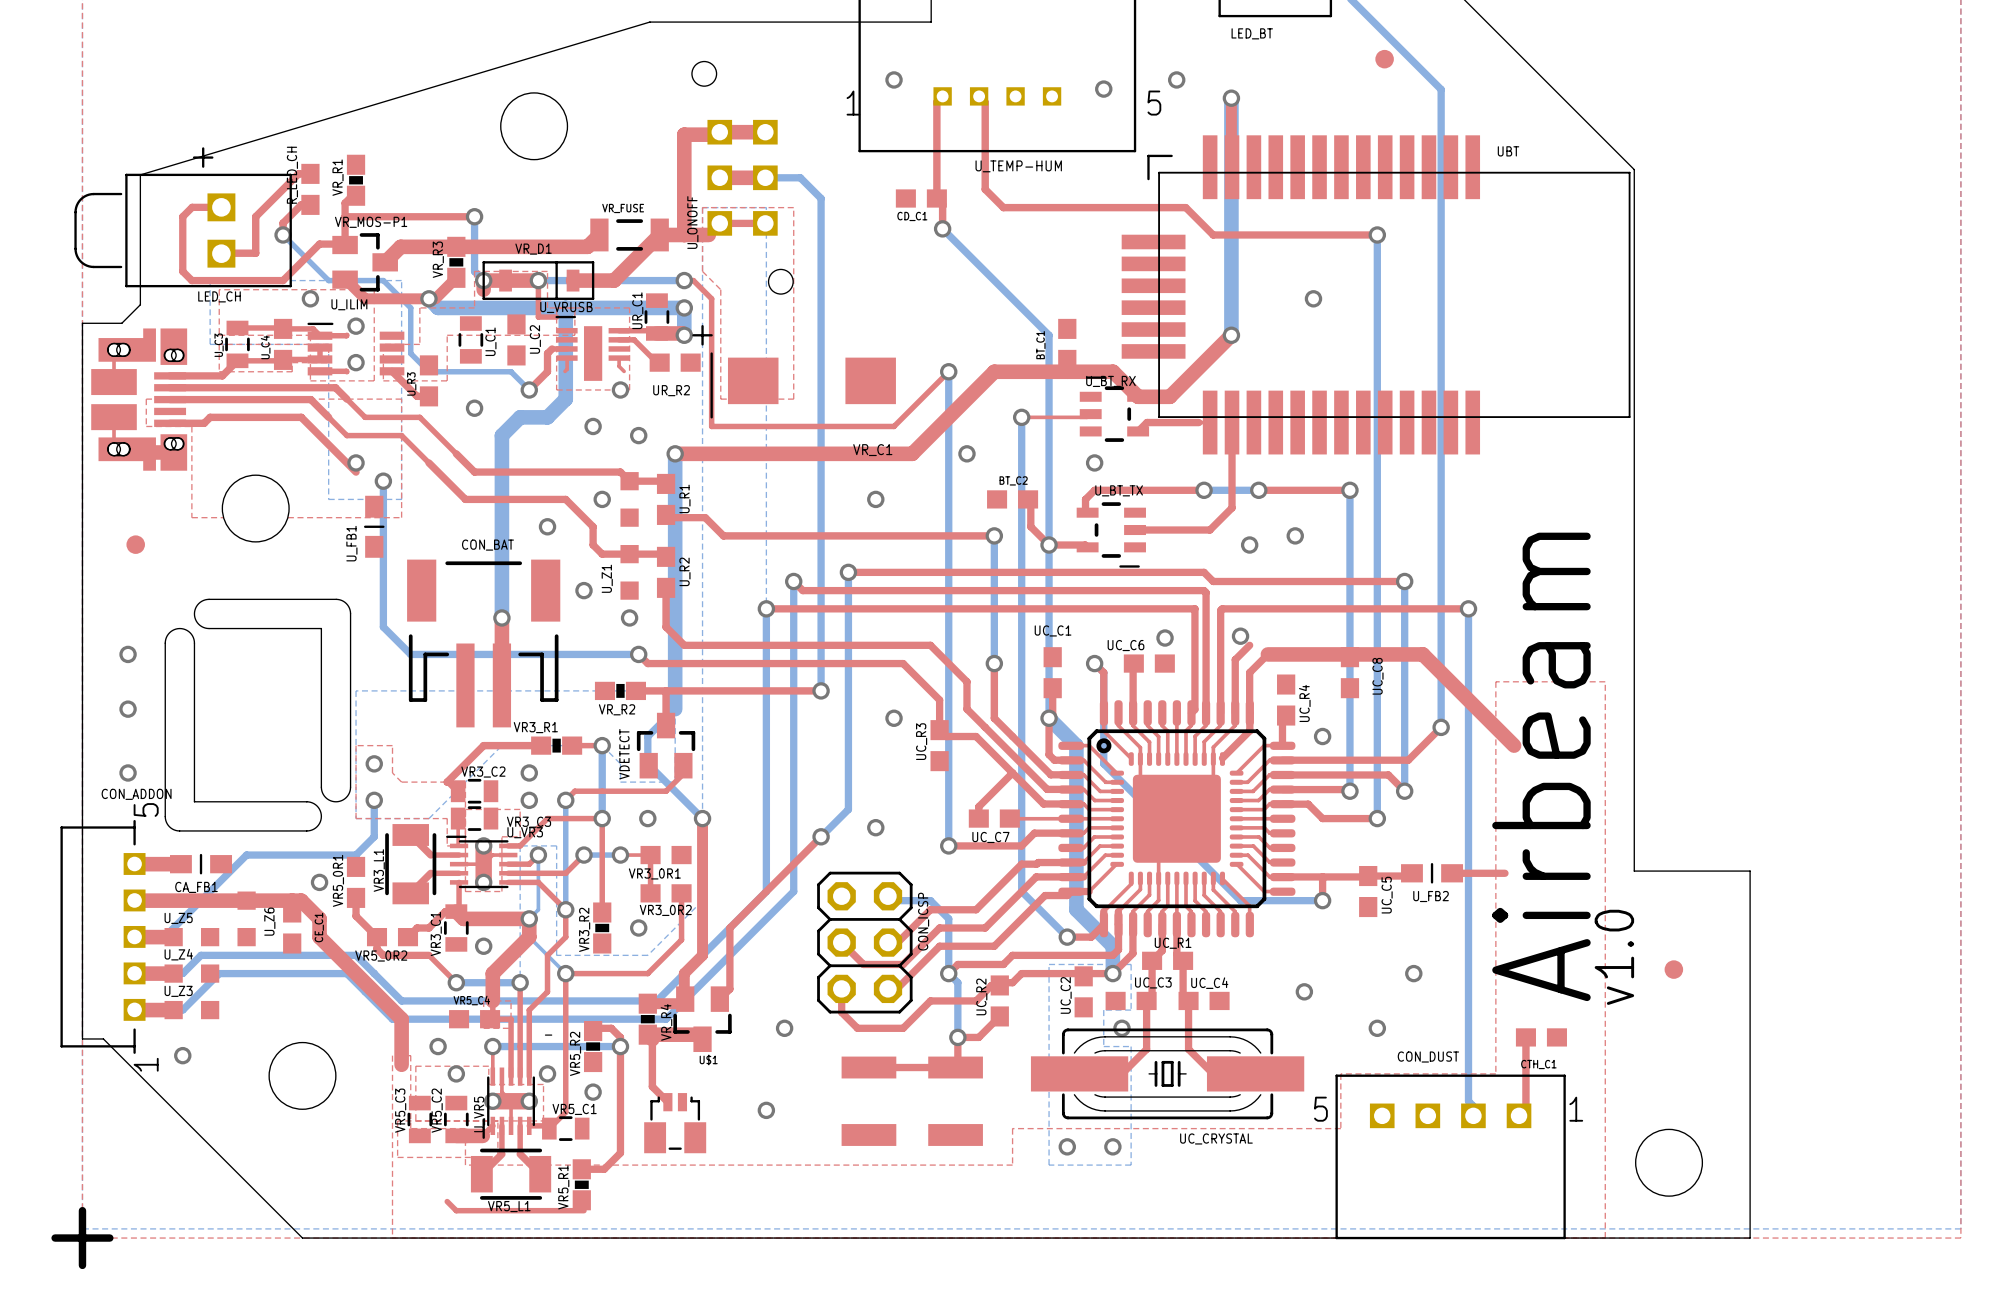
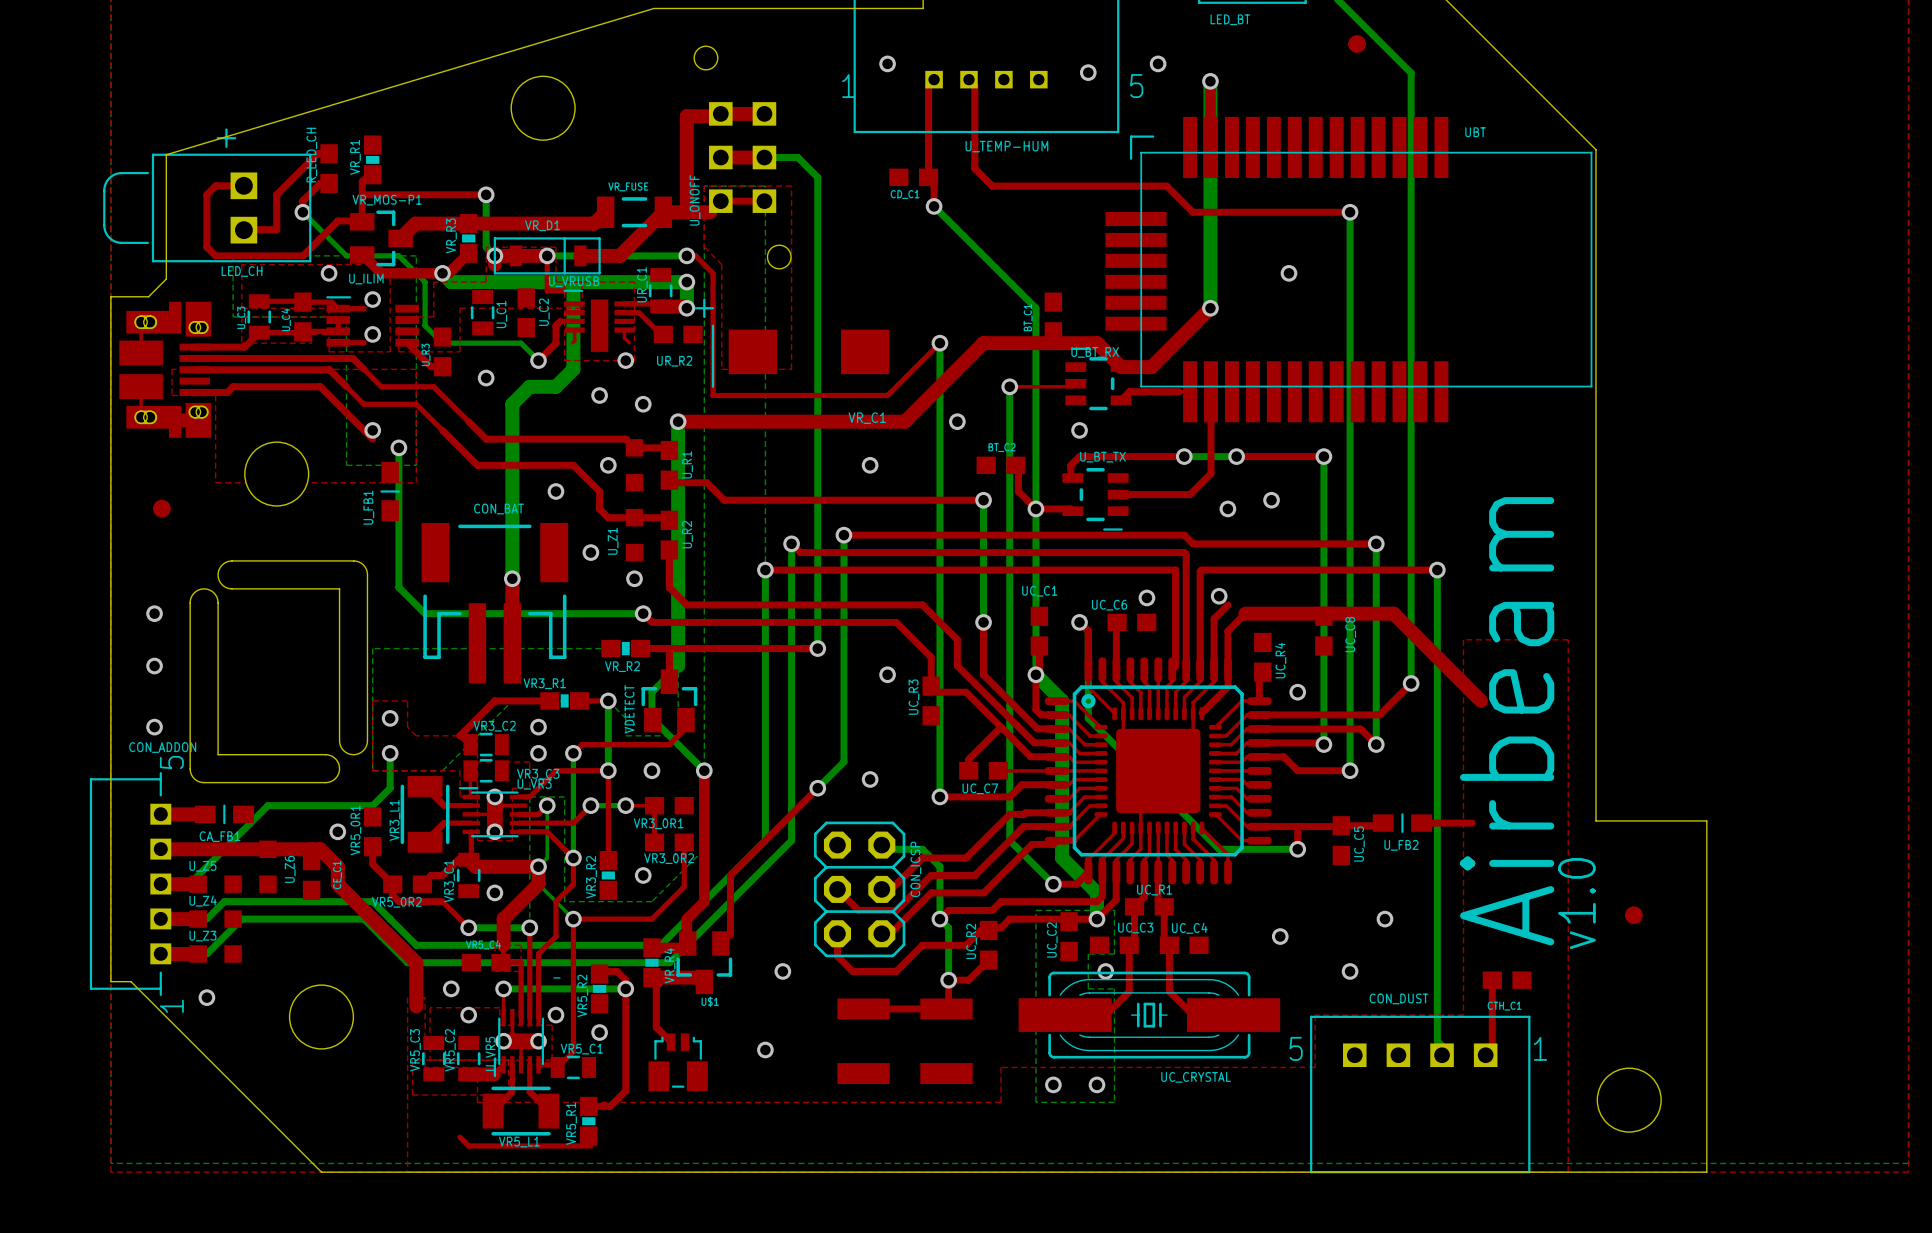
board edge: (82, 1210) (82, 1265) -> none
board edge: (55, 1238) (109, 1238) -> none

